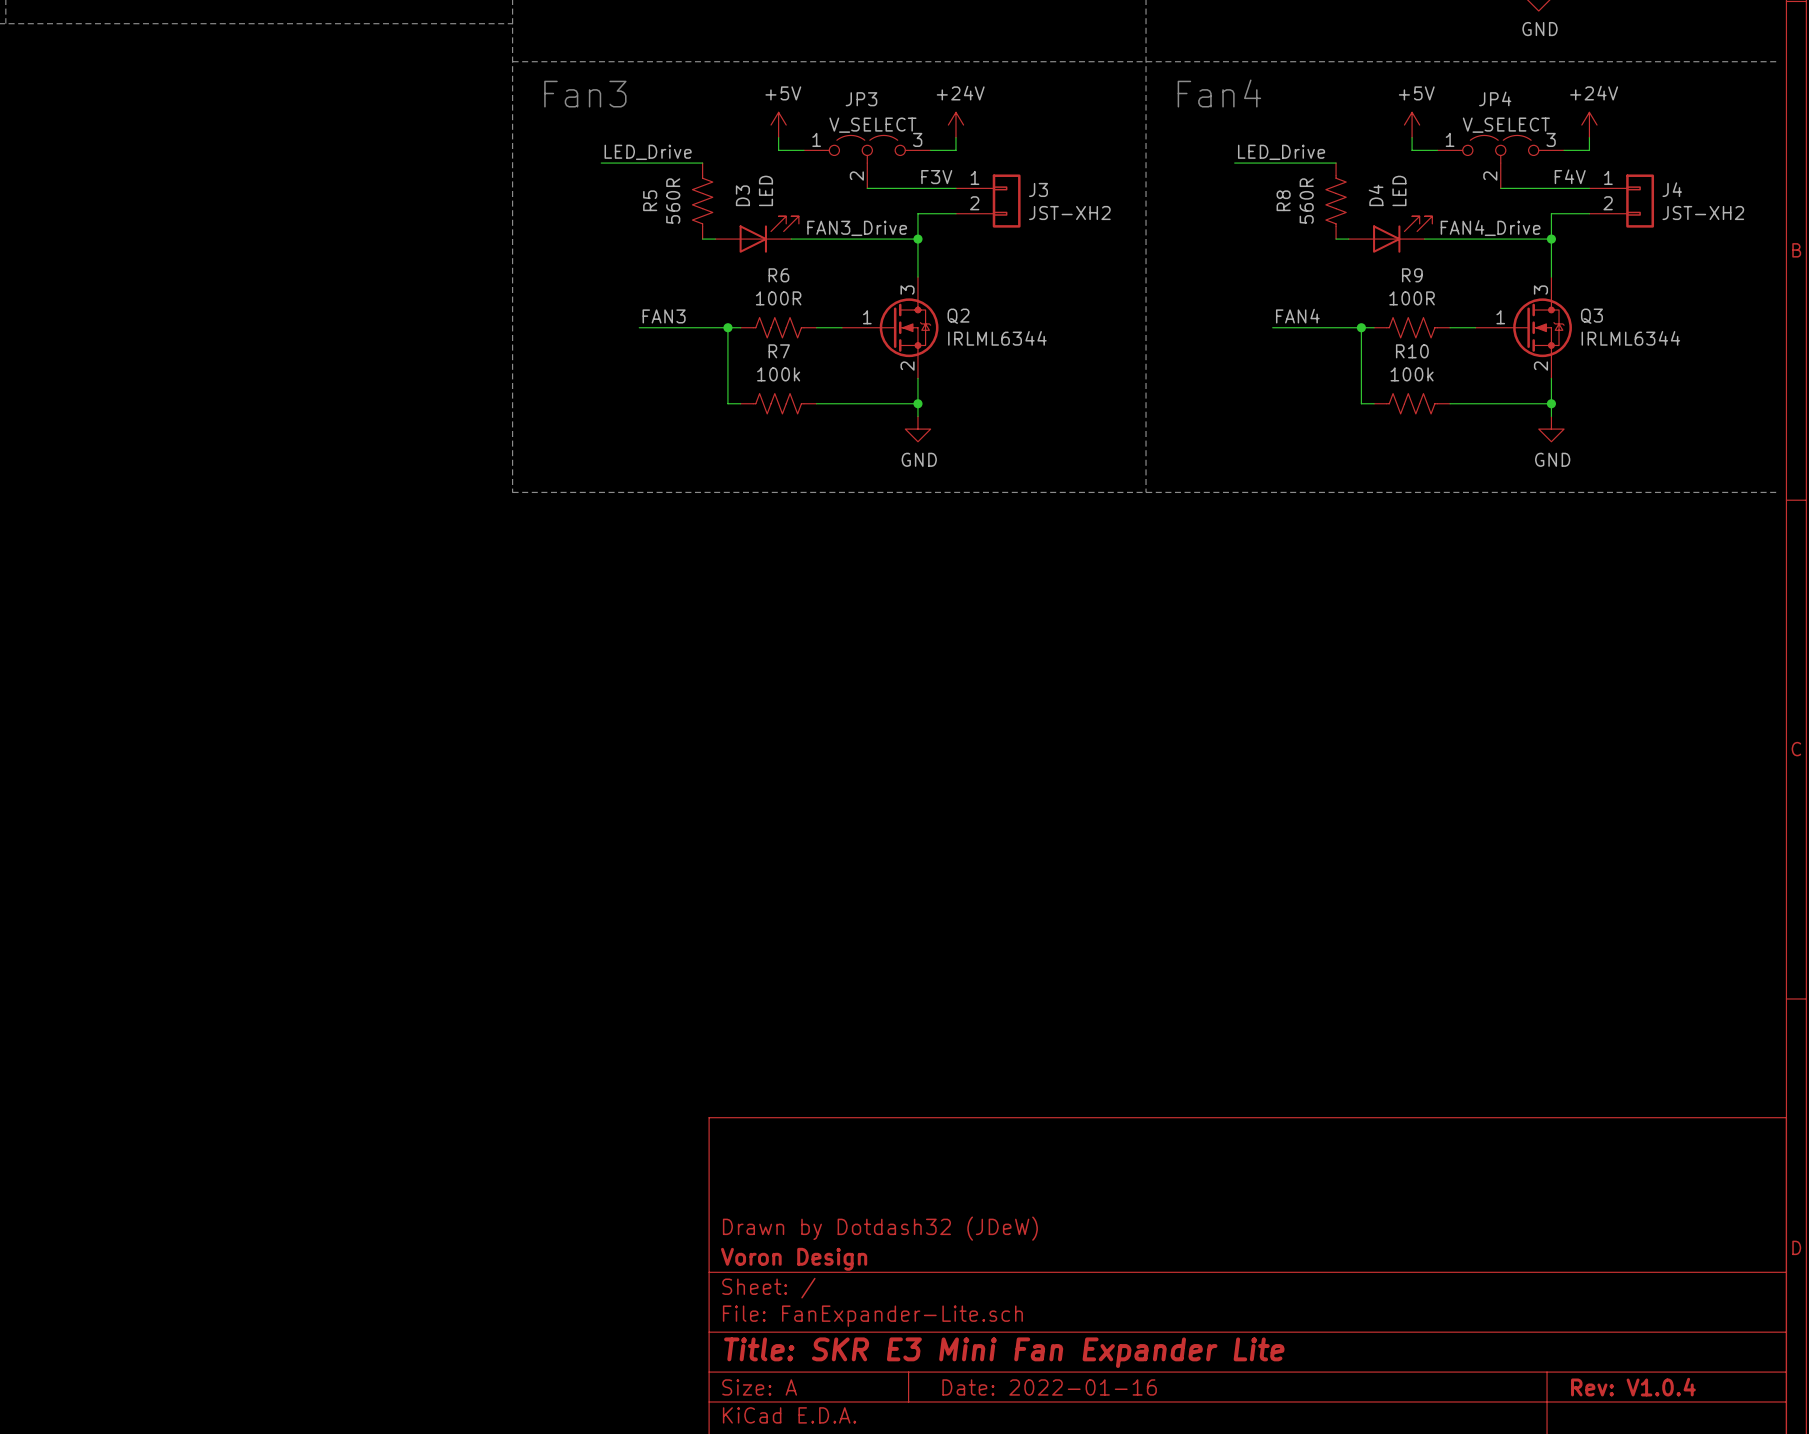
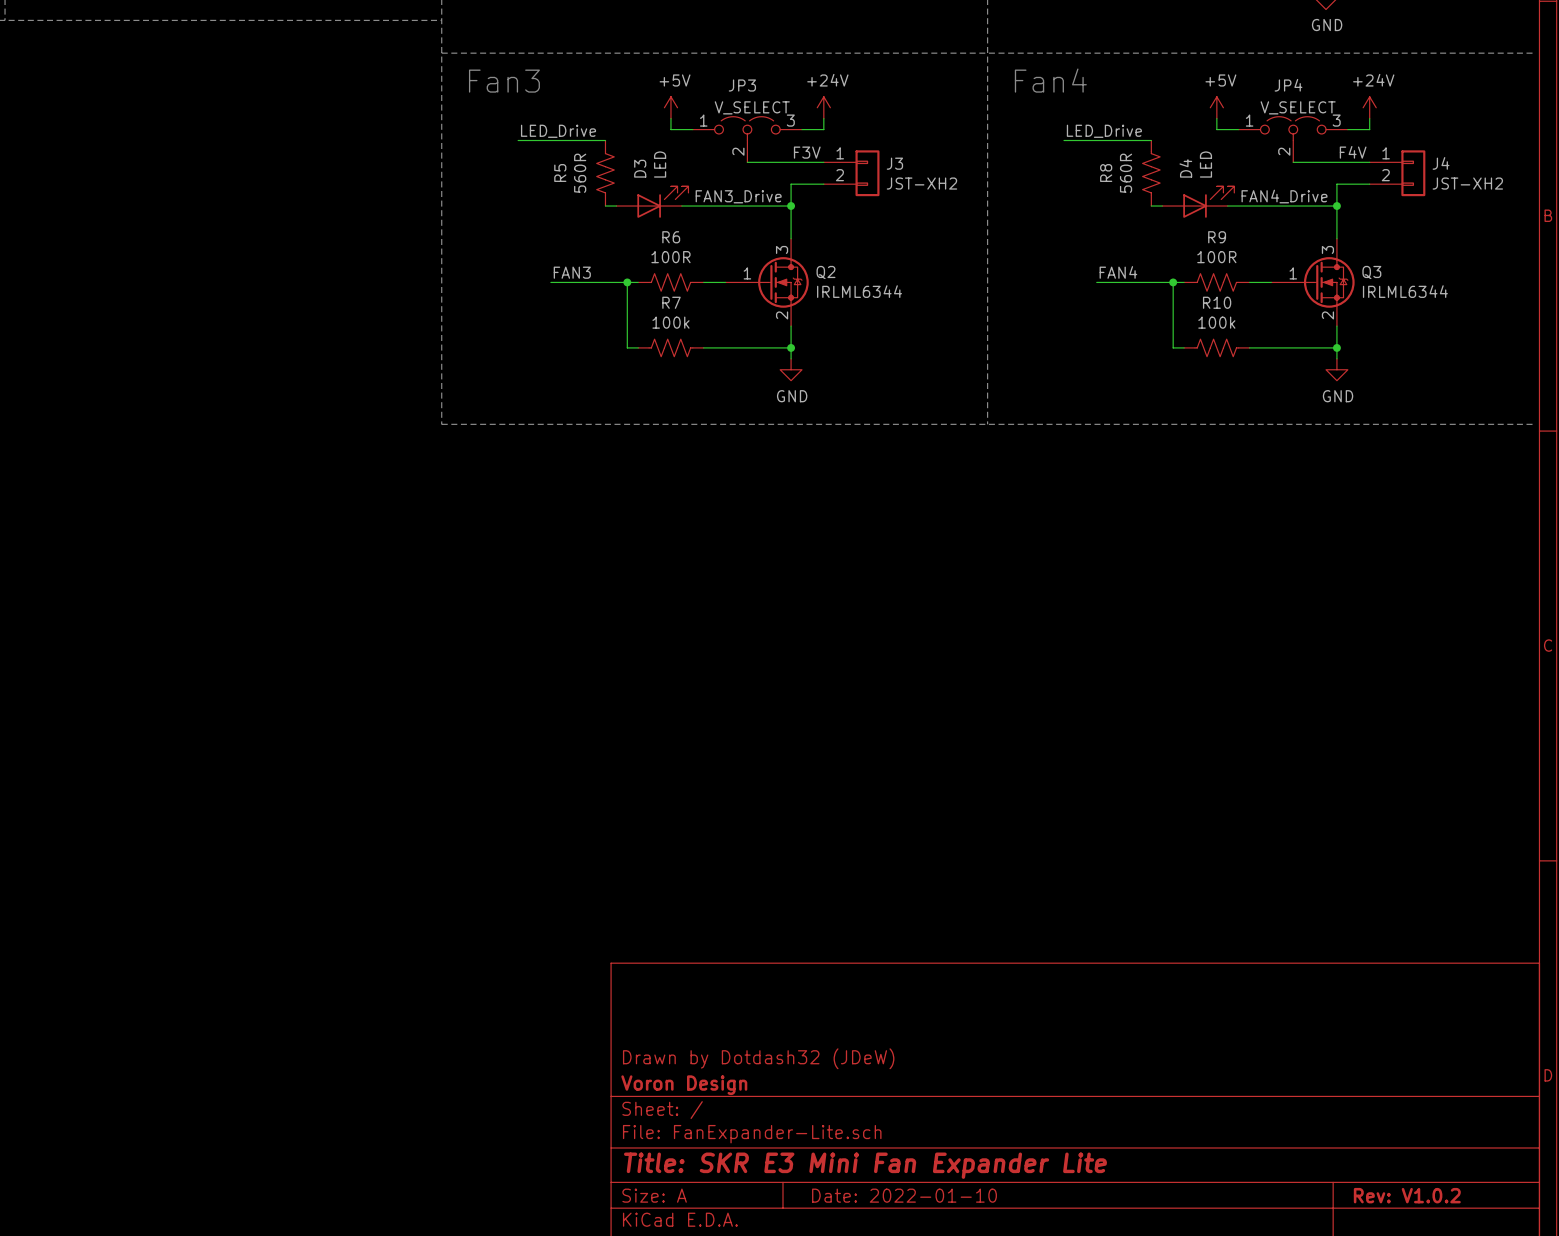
title block: Date: 2022-01-16 (1049, 1387) -> Date: 2022-01-10 (904, 1195)
title block: Rev: V1.0.4 (1633, 1387) -> Rev: V1.0.2 (1407, 1195)

